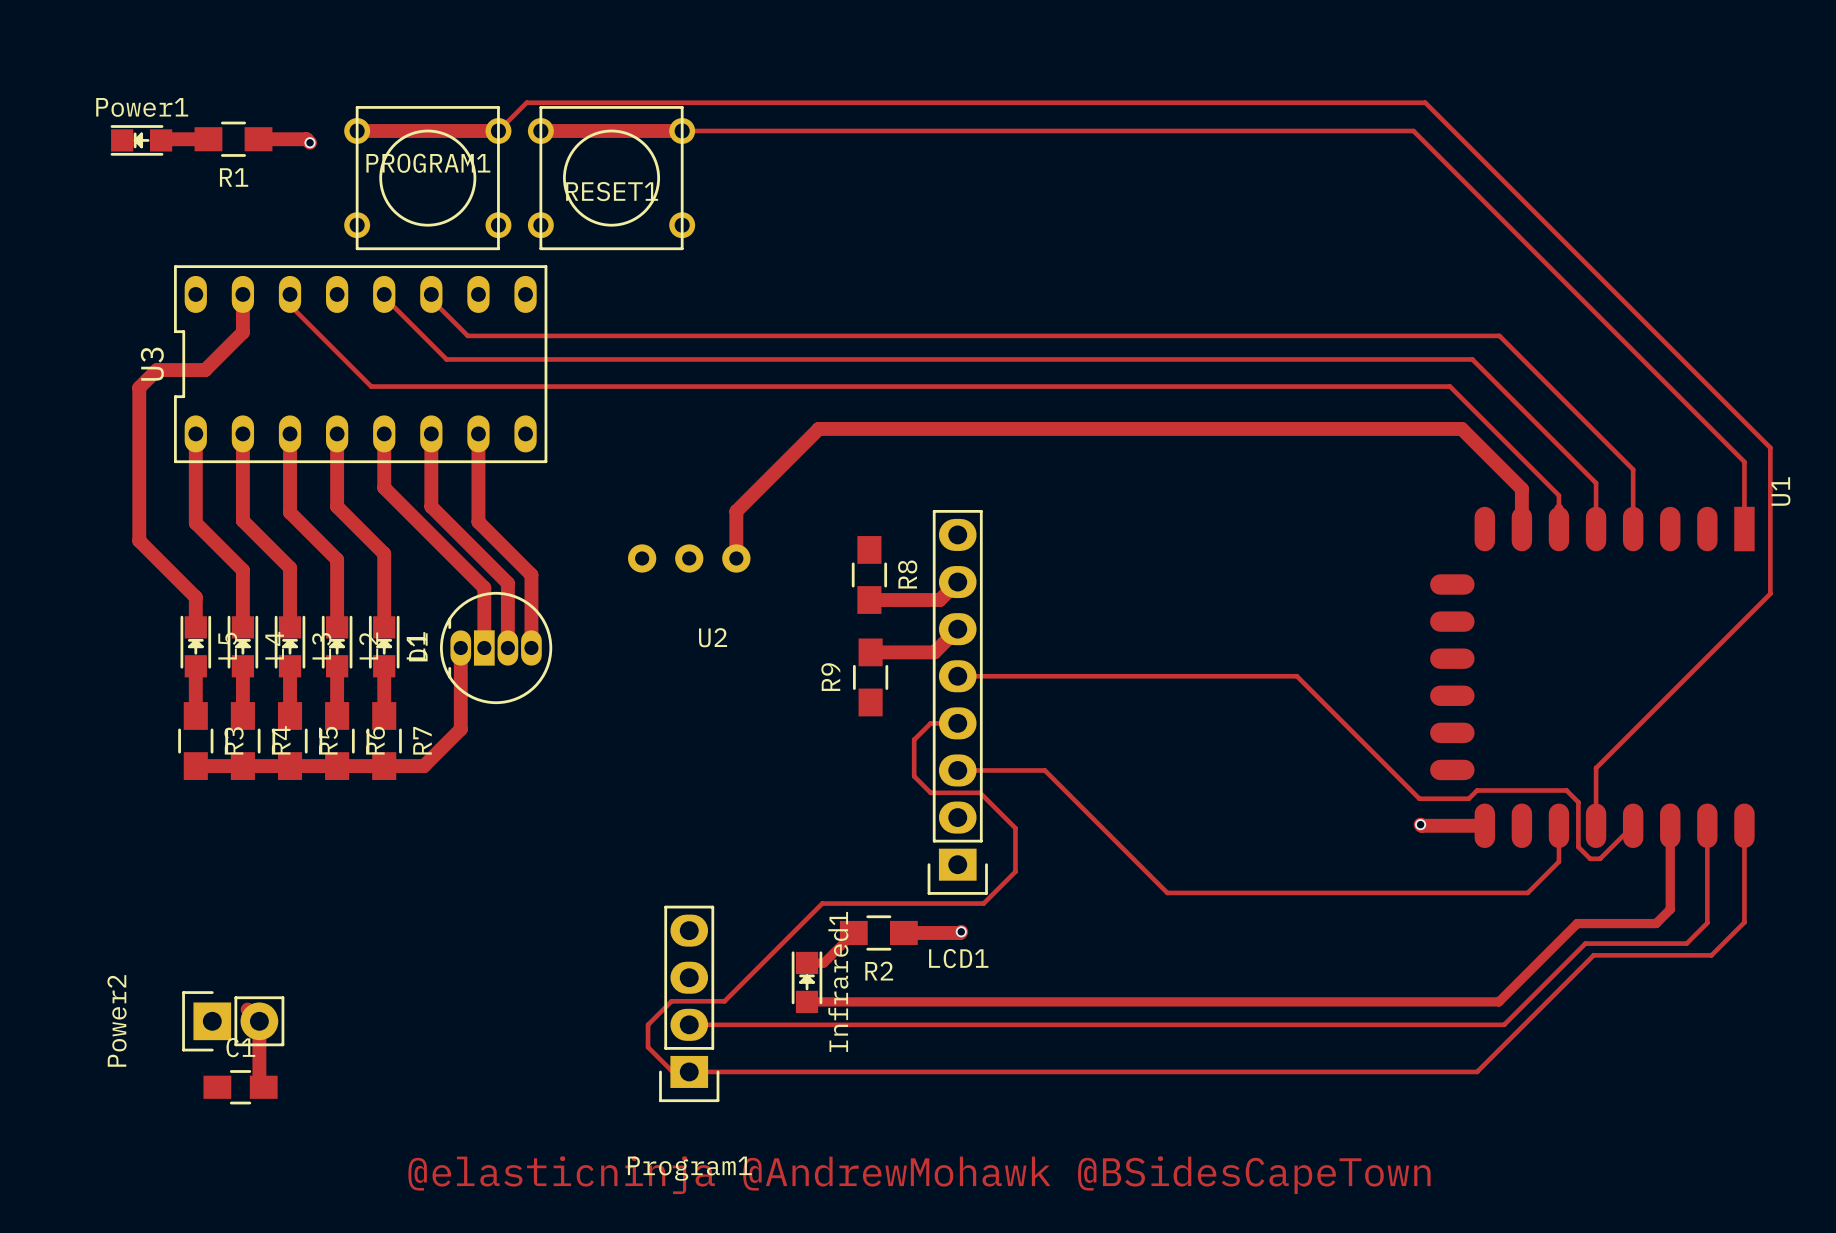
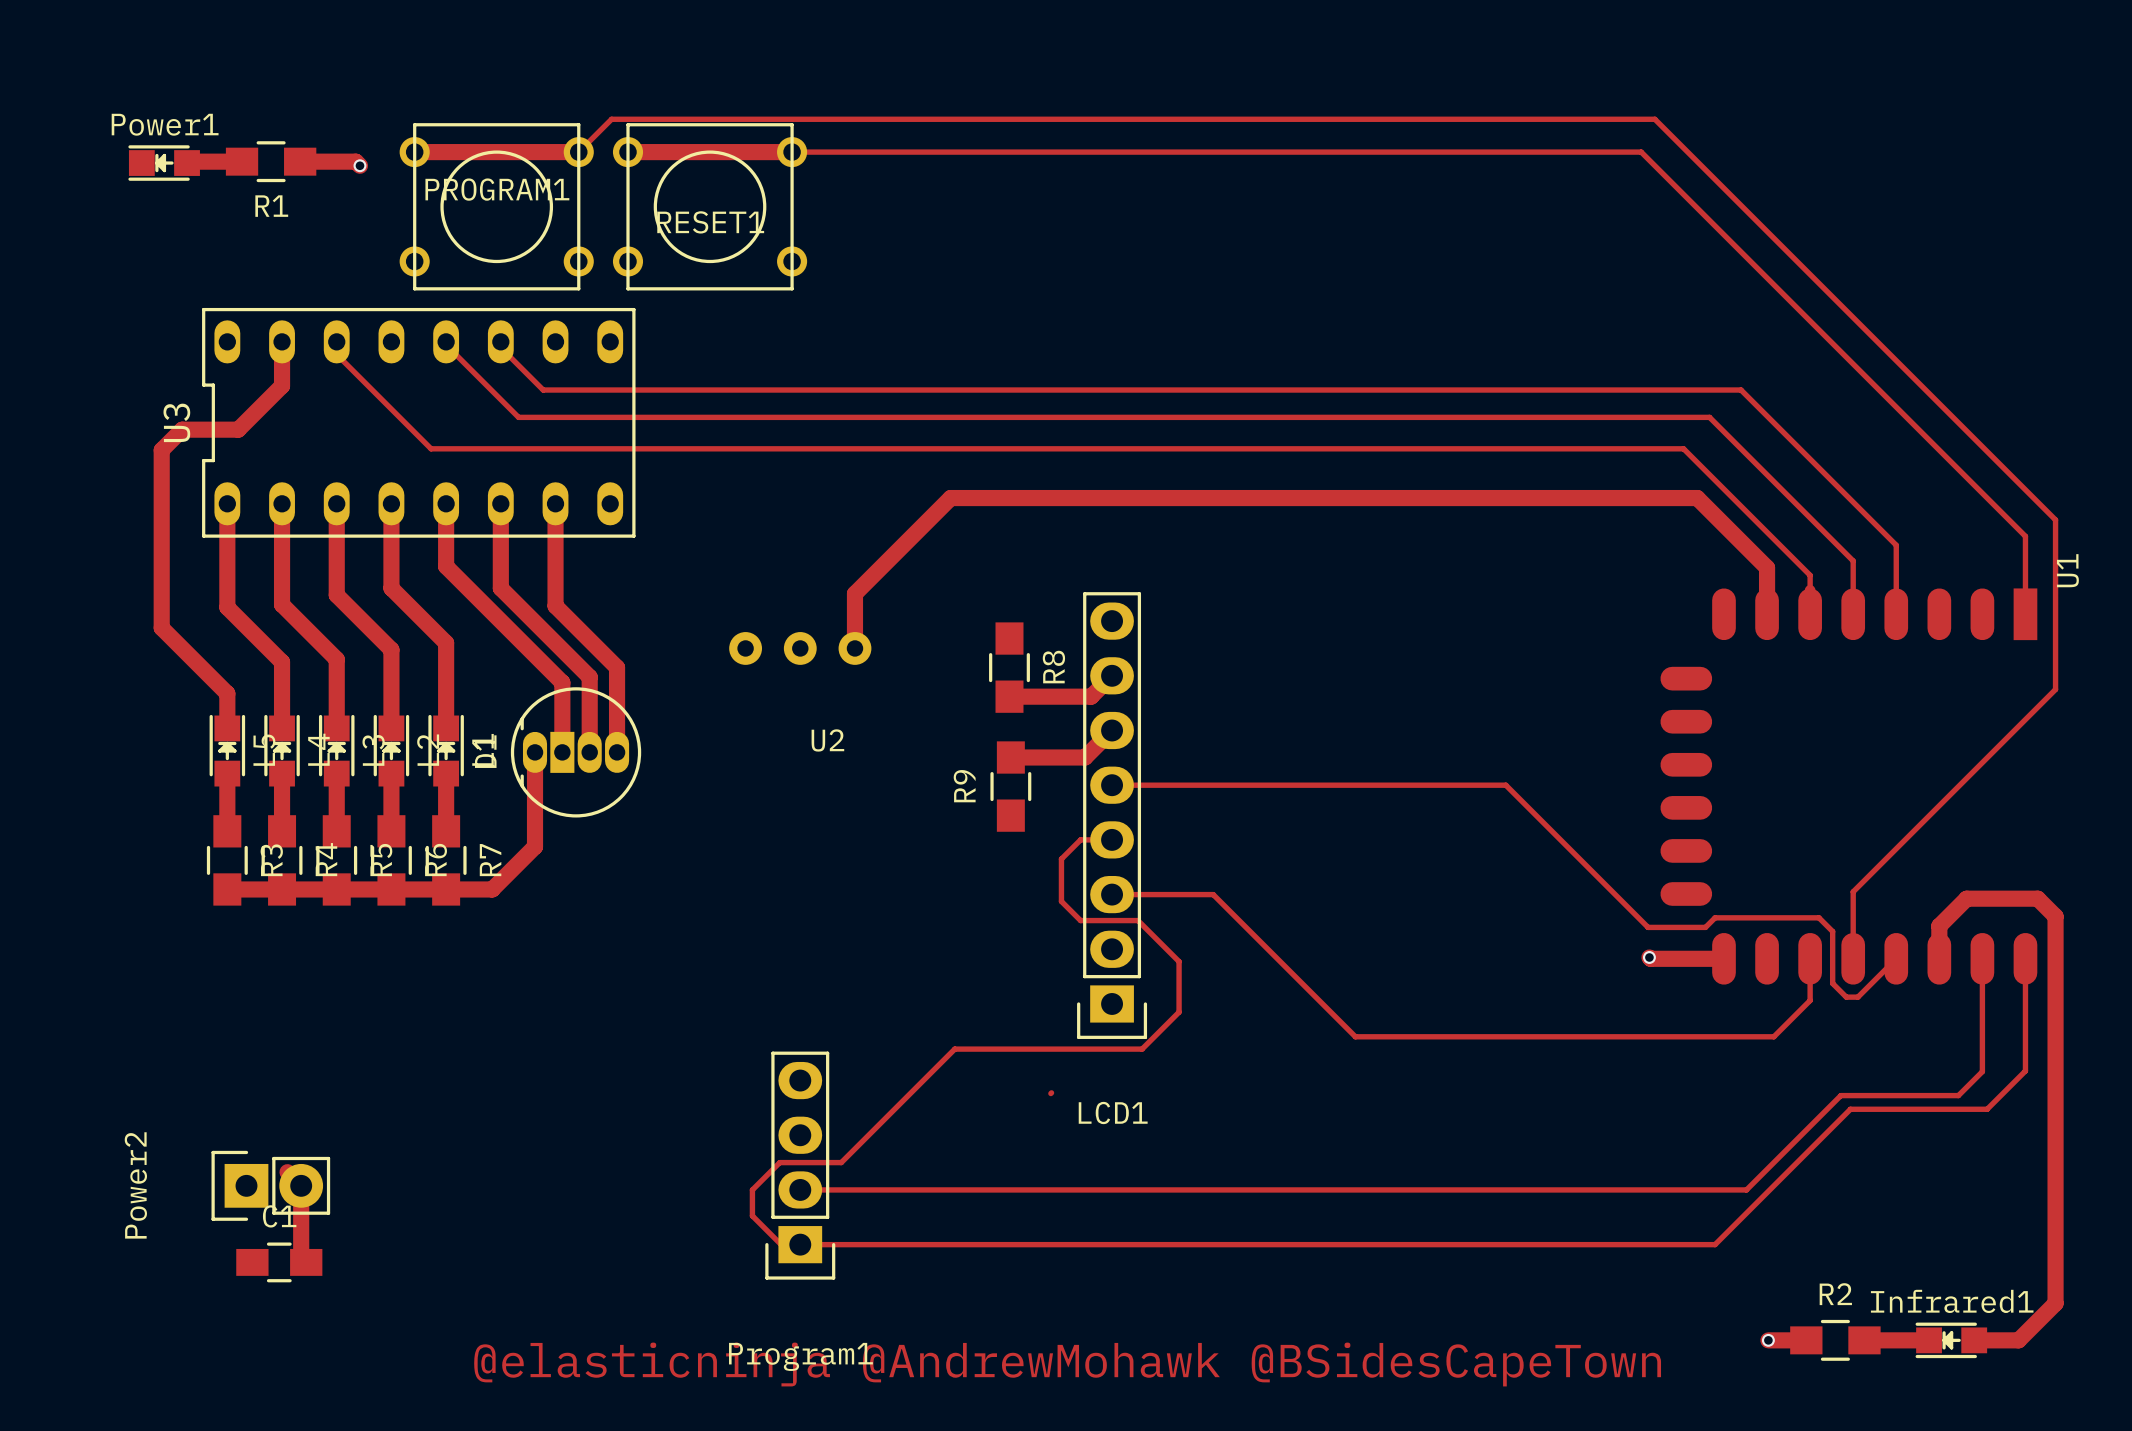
track: none -> (1939, 958) (1939, 926) (1966, 898) (2037, 898) (2055, 916) (2055, 1303) (2018, 1340) (1974, 1340)
track: (1670, 845) (1670, 825) (1670, 909) (1656, 923) (1577, 923) (1498, 1001) (807, 1001) -> none
track: (961, 931) (903, 932) -> none
via: (961, 931) -> none
track: (853, 932) (823, 962) (807, 962) -> none
R2 position: (878, 932) -> (1835, 1340)
R2 name position: R2 (879, 971) -> R2 (1835, 1294)
Infrared1 rotation: 0° (807, 982) -> 90° counterclockwise (1951, 1340)
Infrared1 position: (807, 982) -> (1951, 1340)
track: none -> (1768, 1340) (1806, 1340)
via: none -> (1768, 1340)
track: none -> (1864, 1340) (1929, 1340)

